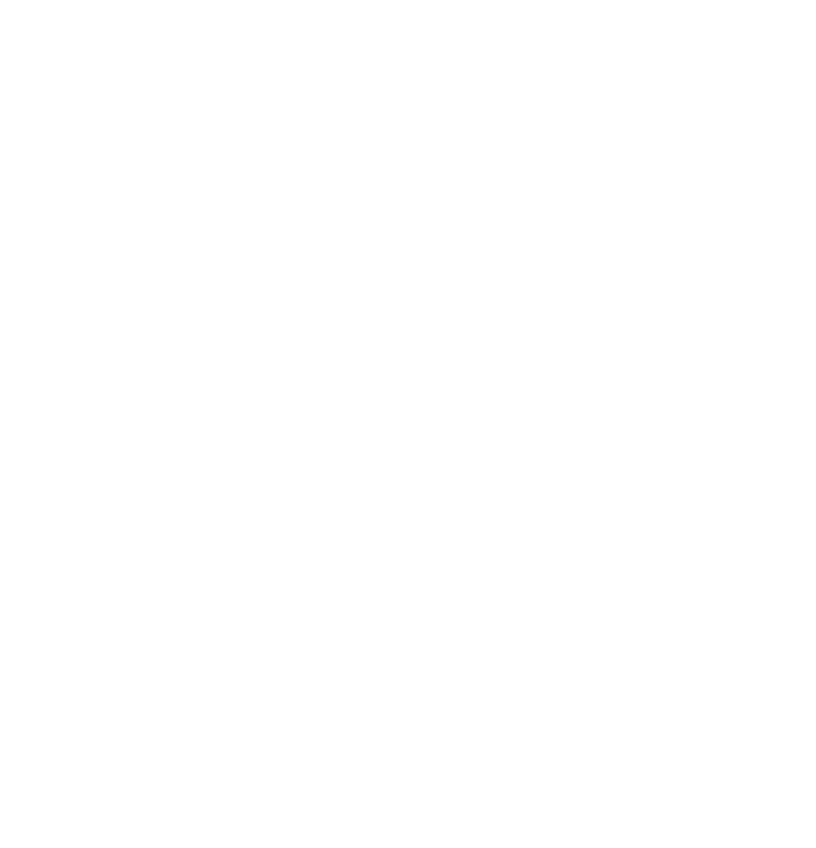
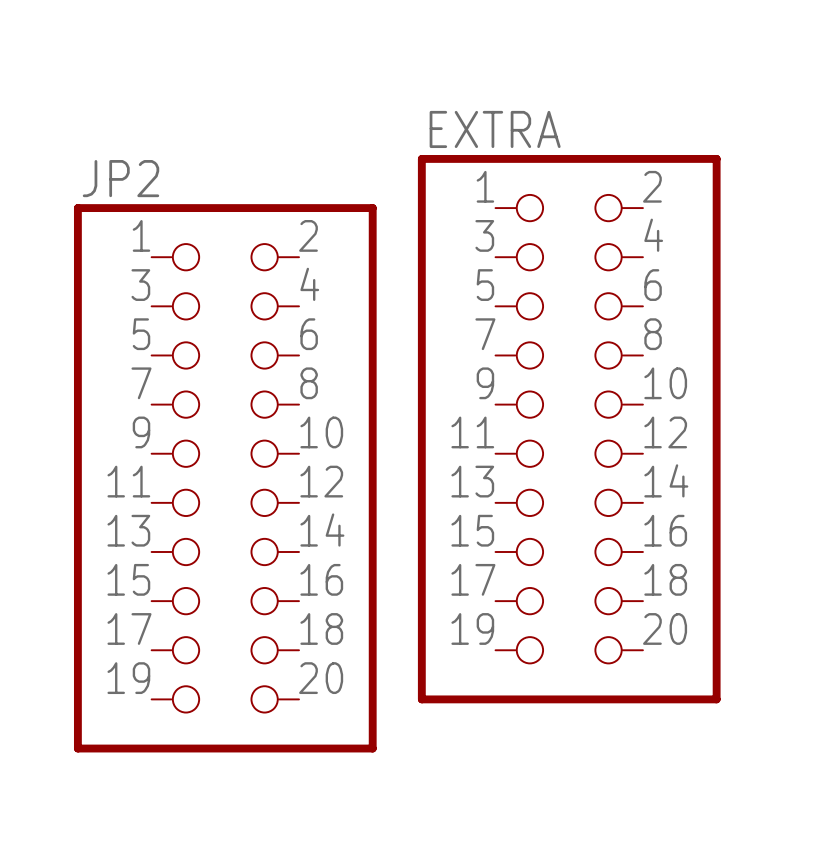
EXTRA: none -> (569, 429)
JP2: none -> (225, 478)

